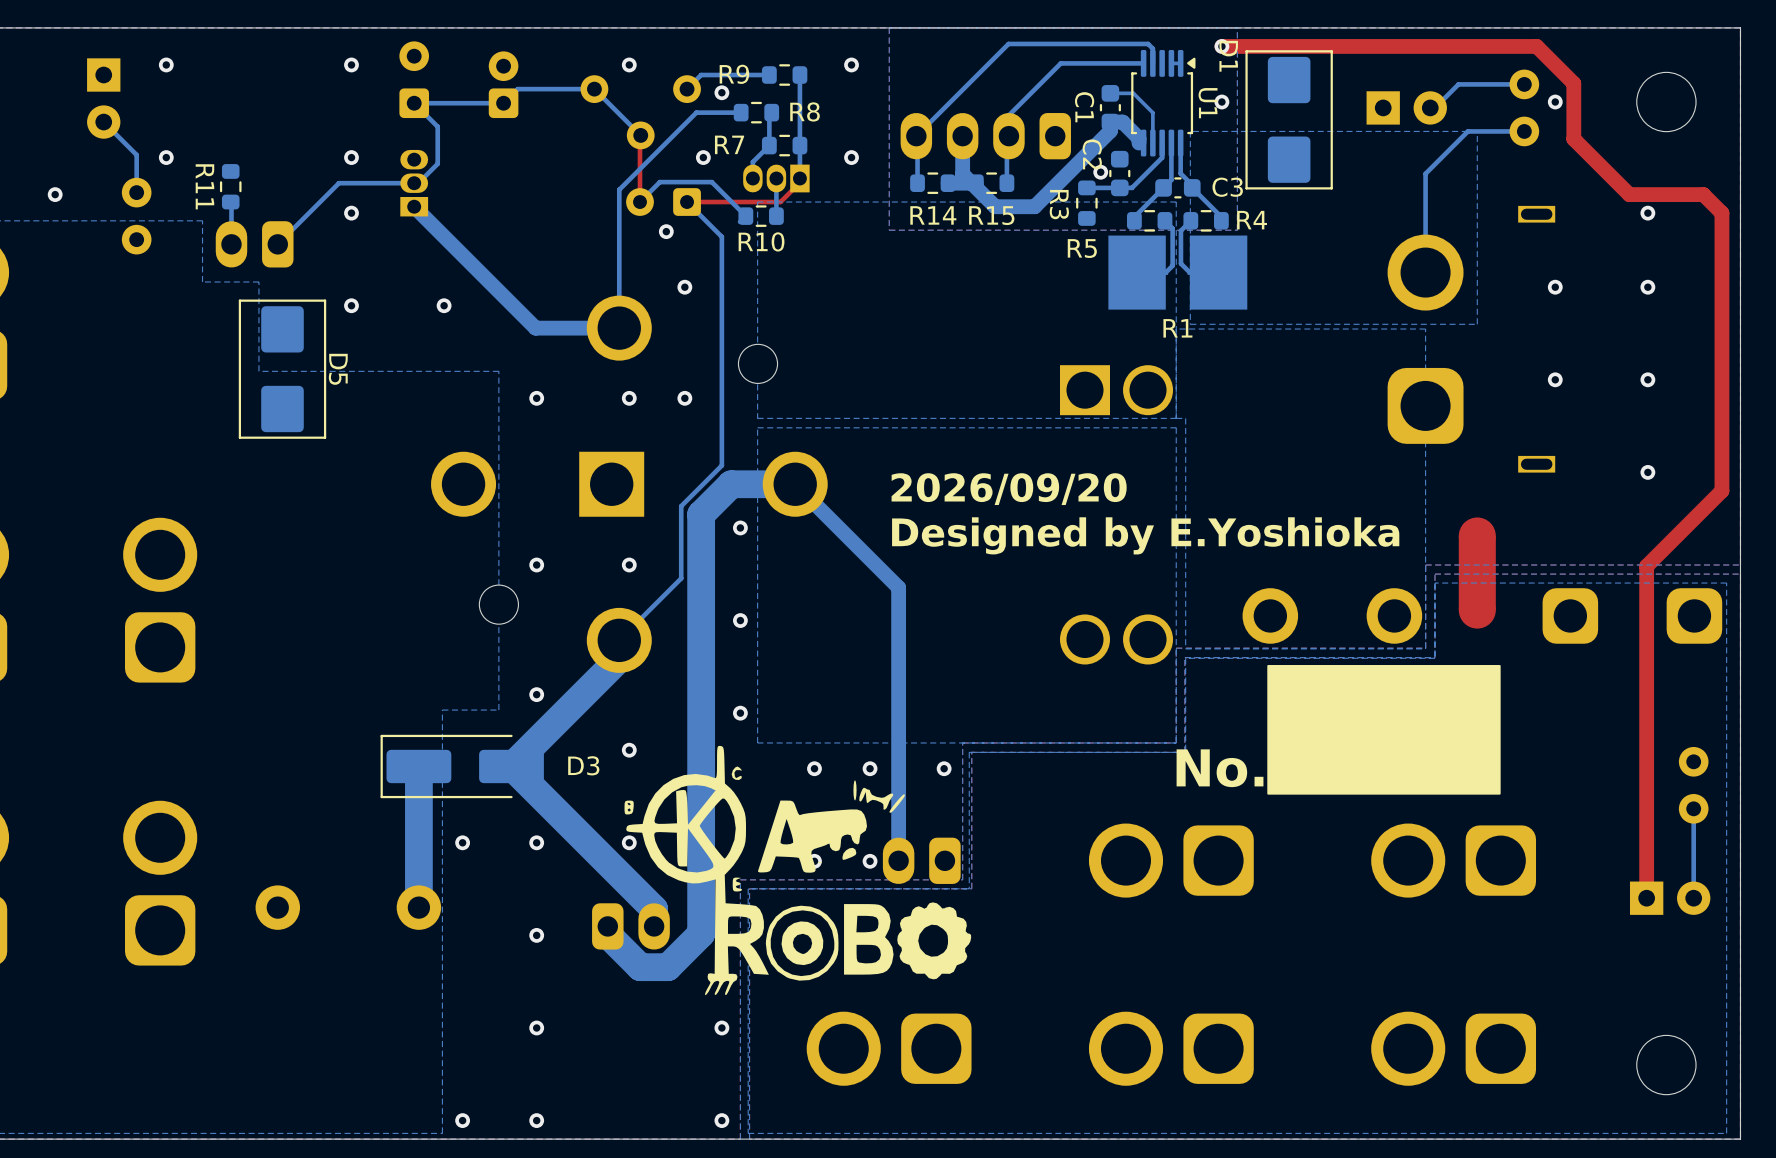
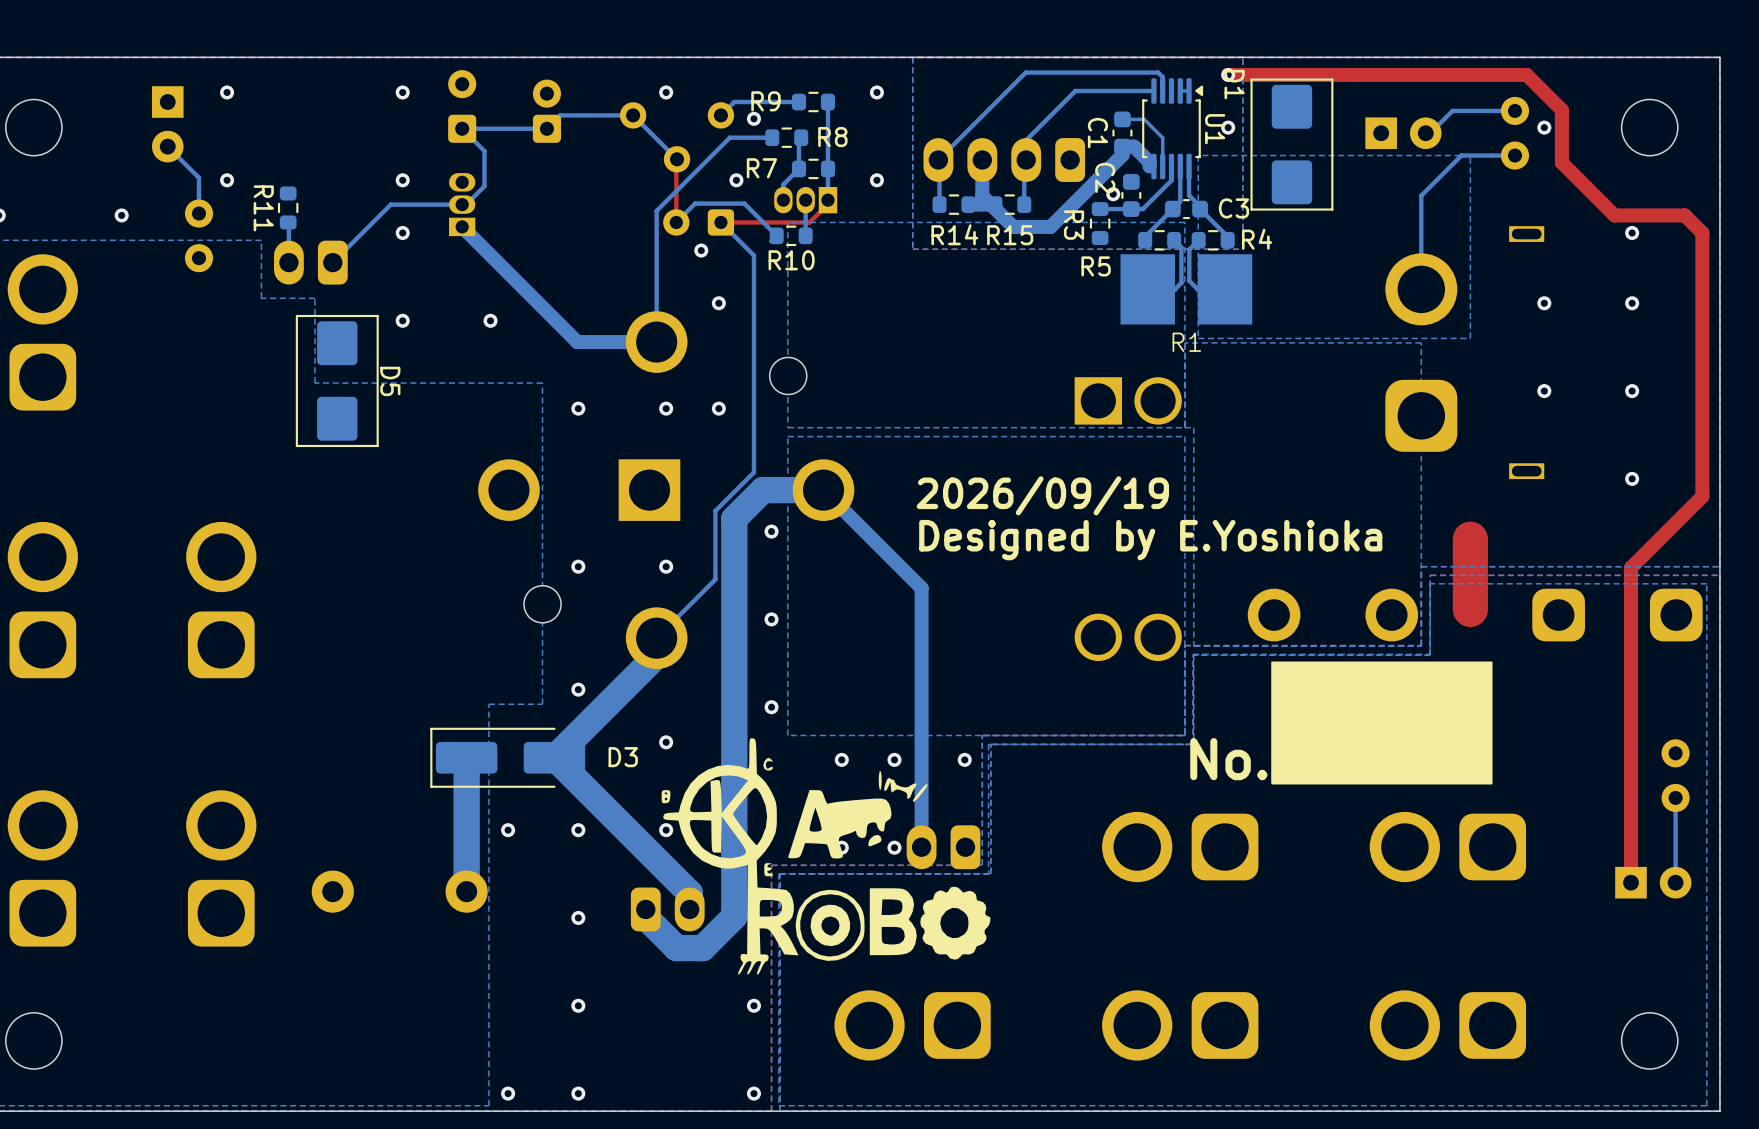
text: 2026/09/20 (1009, 489) -> 2026/09/19 (1042, 495)

